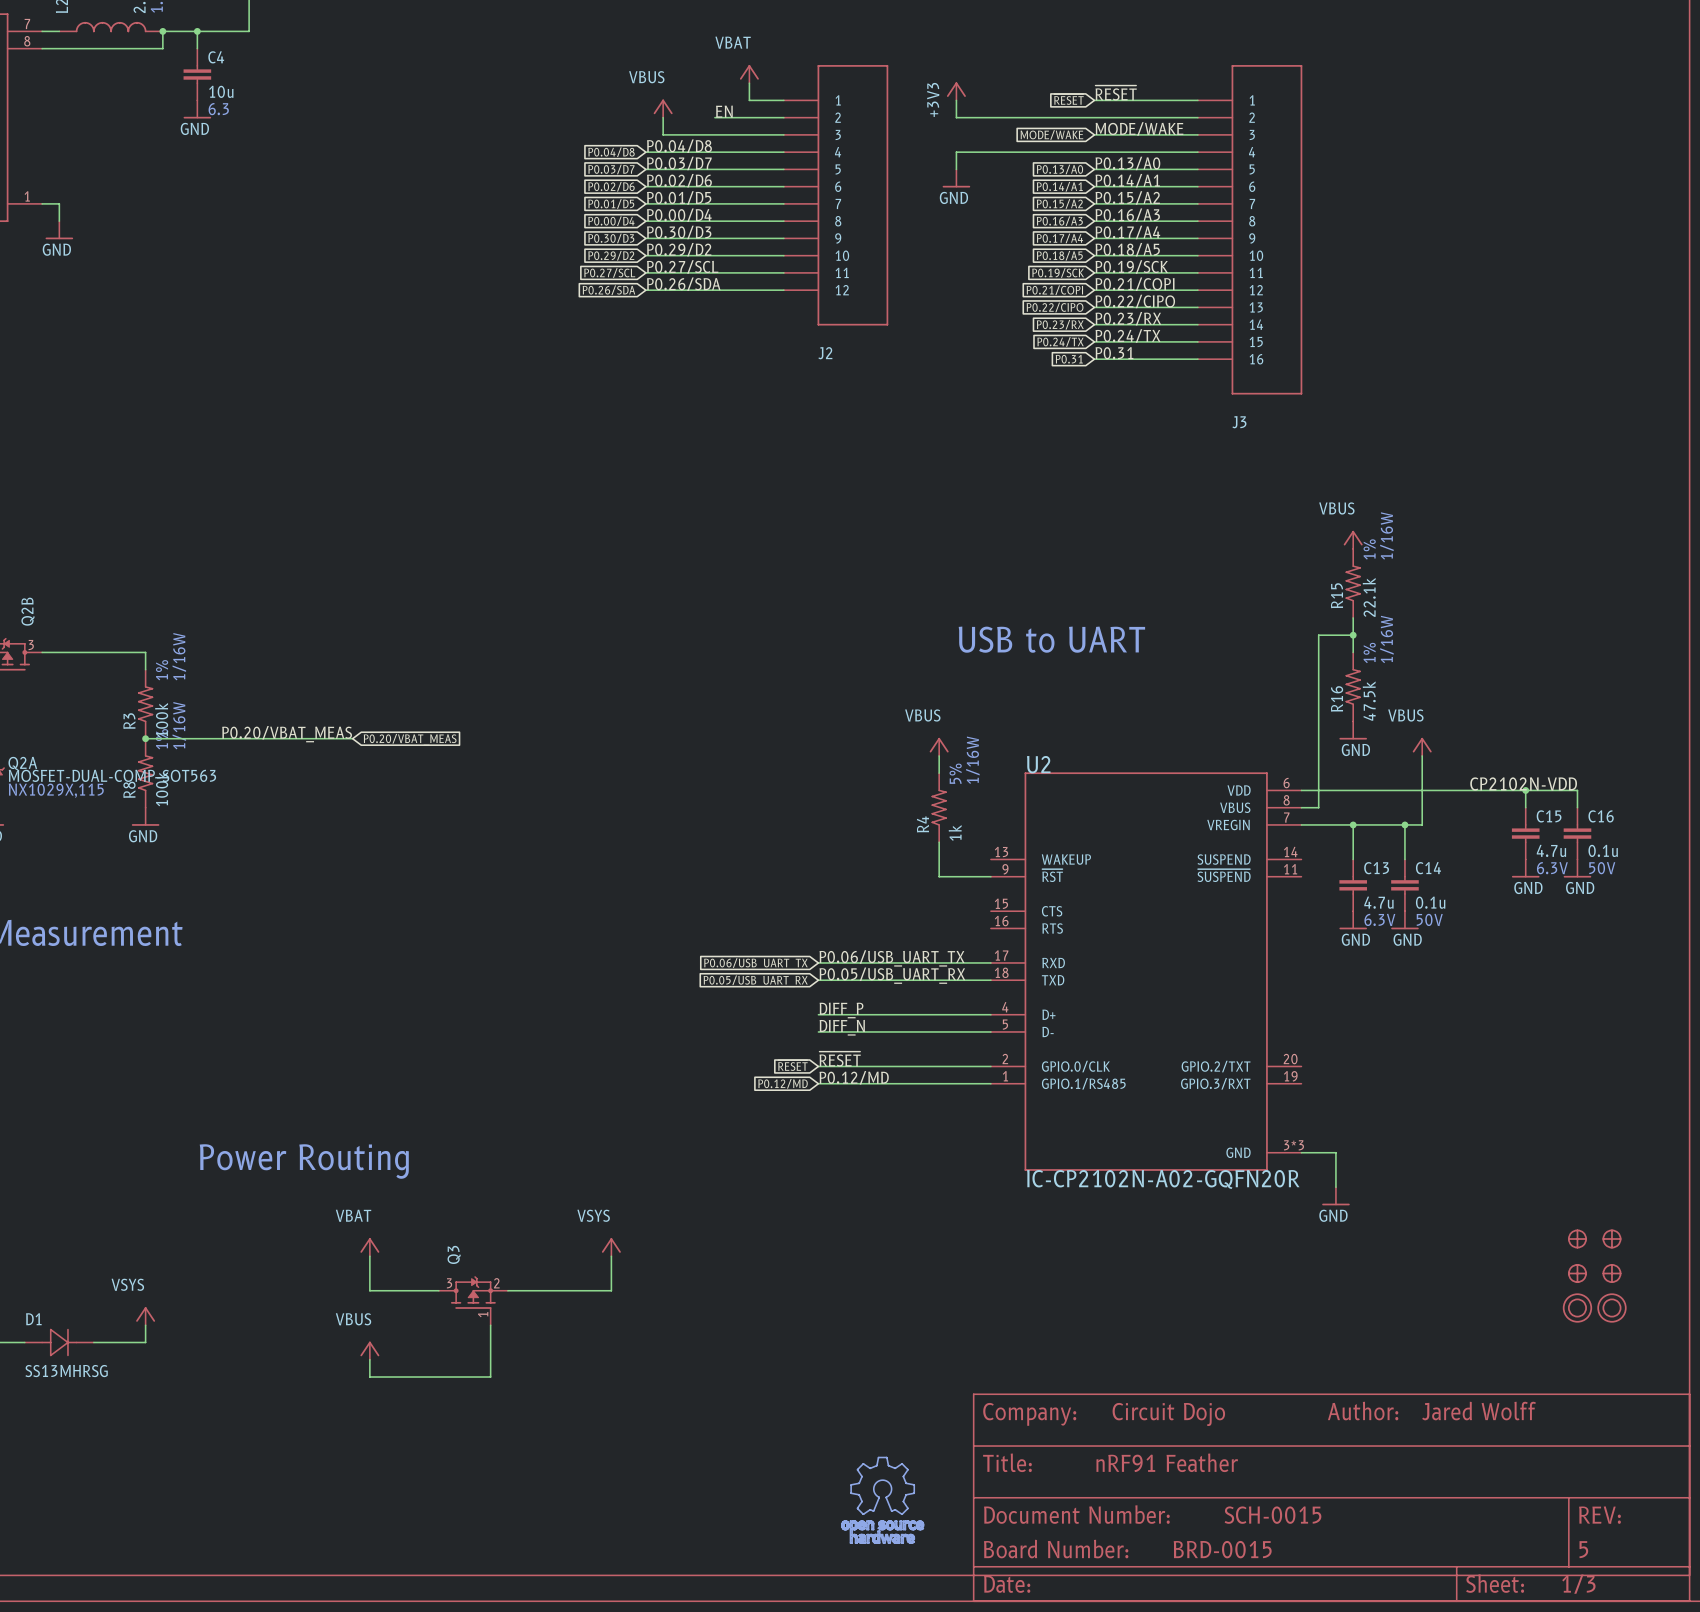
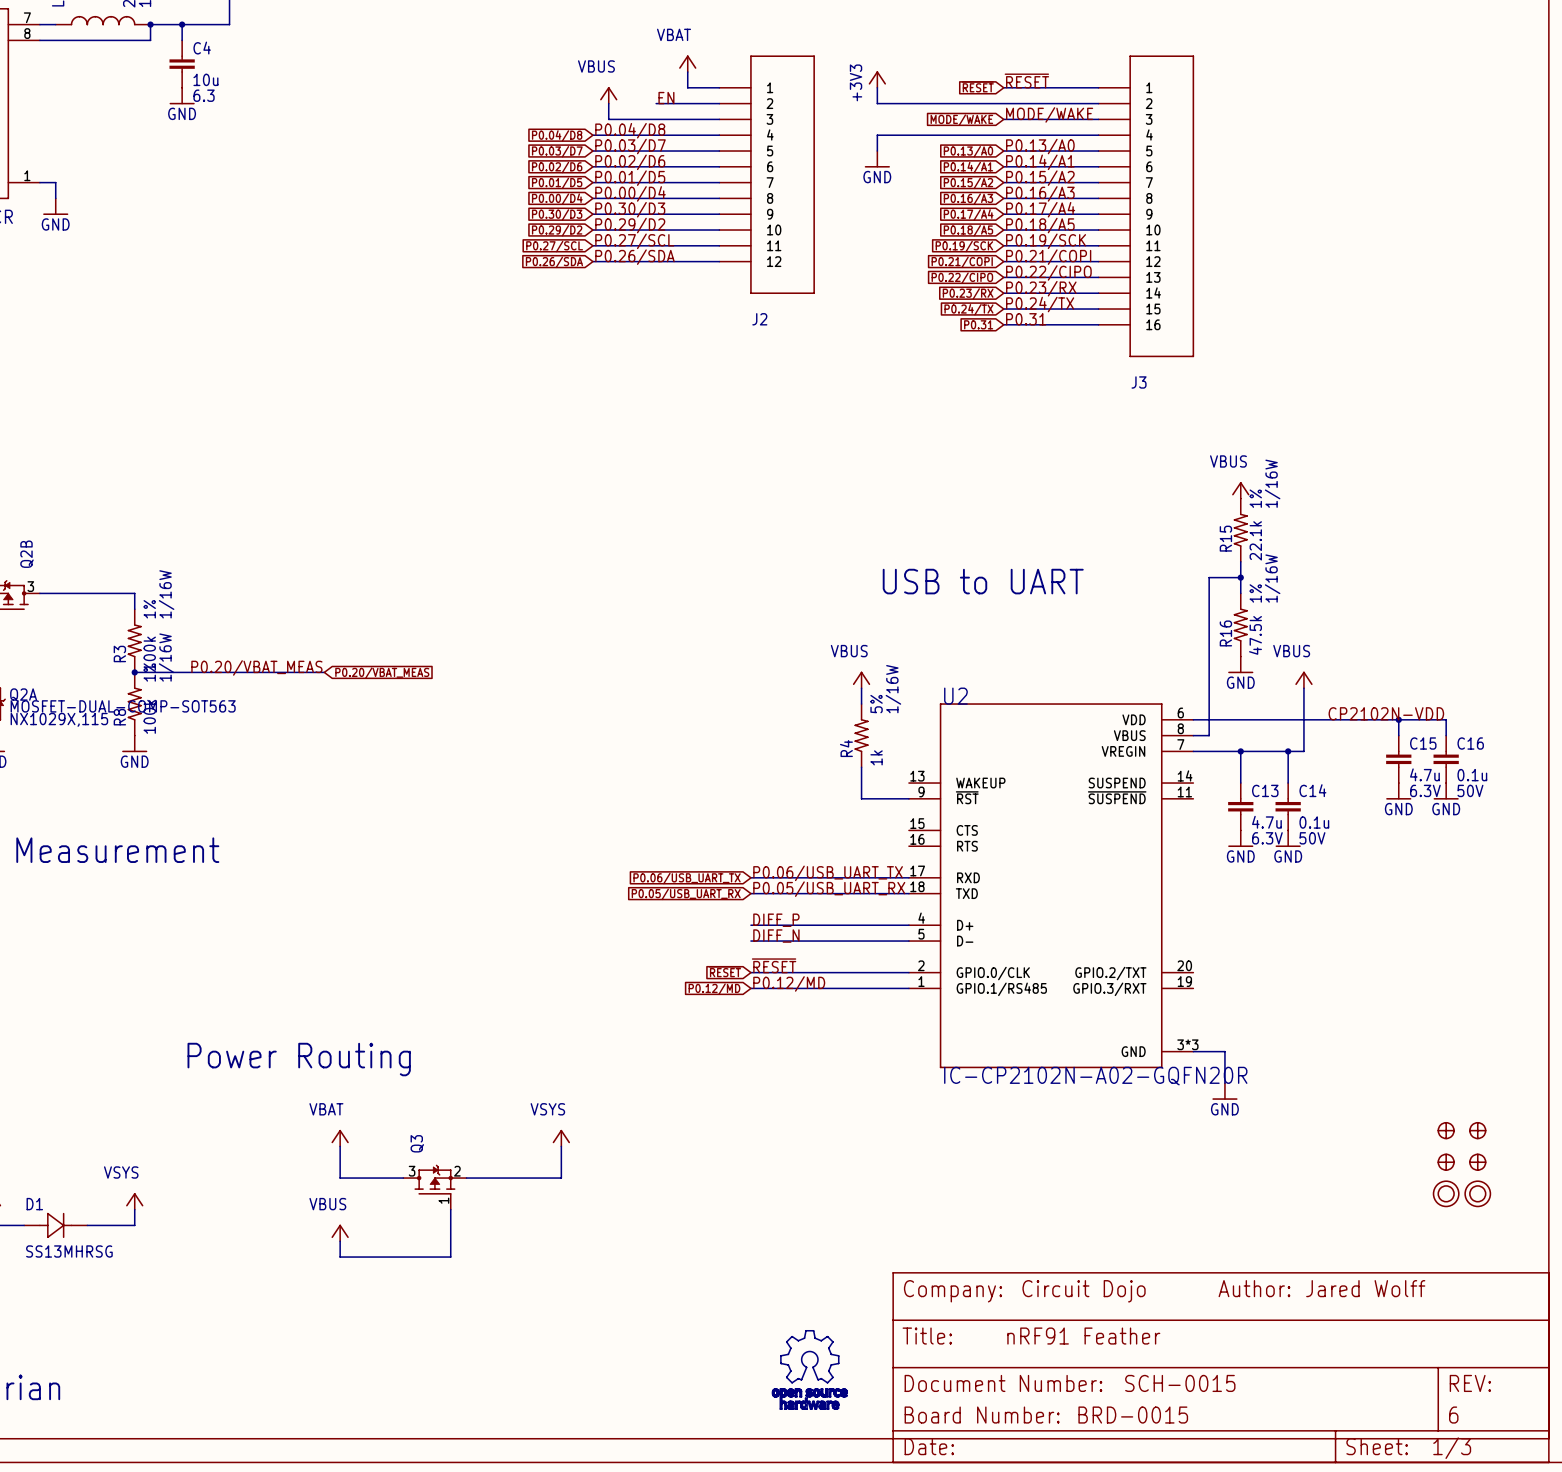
part text: 5 (1583, 1549) -> 6 (1453, 1415)

